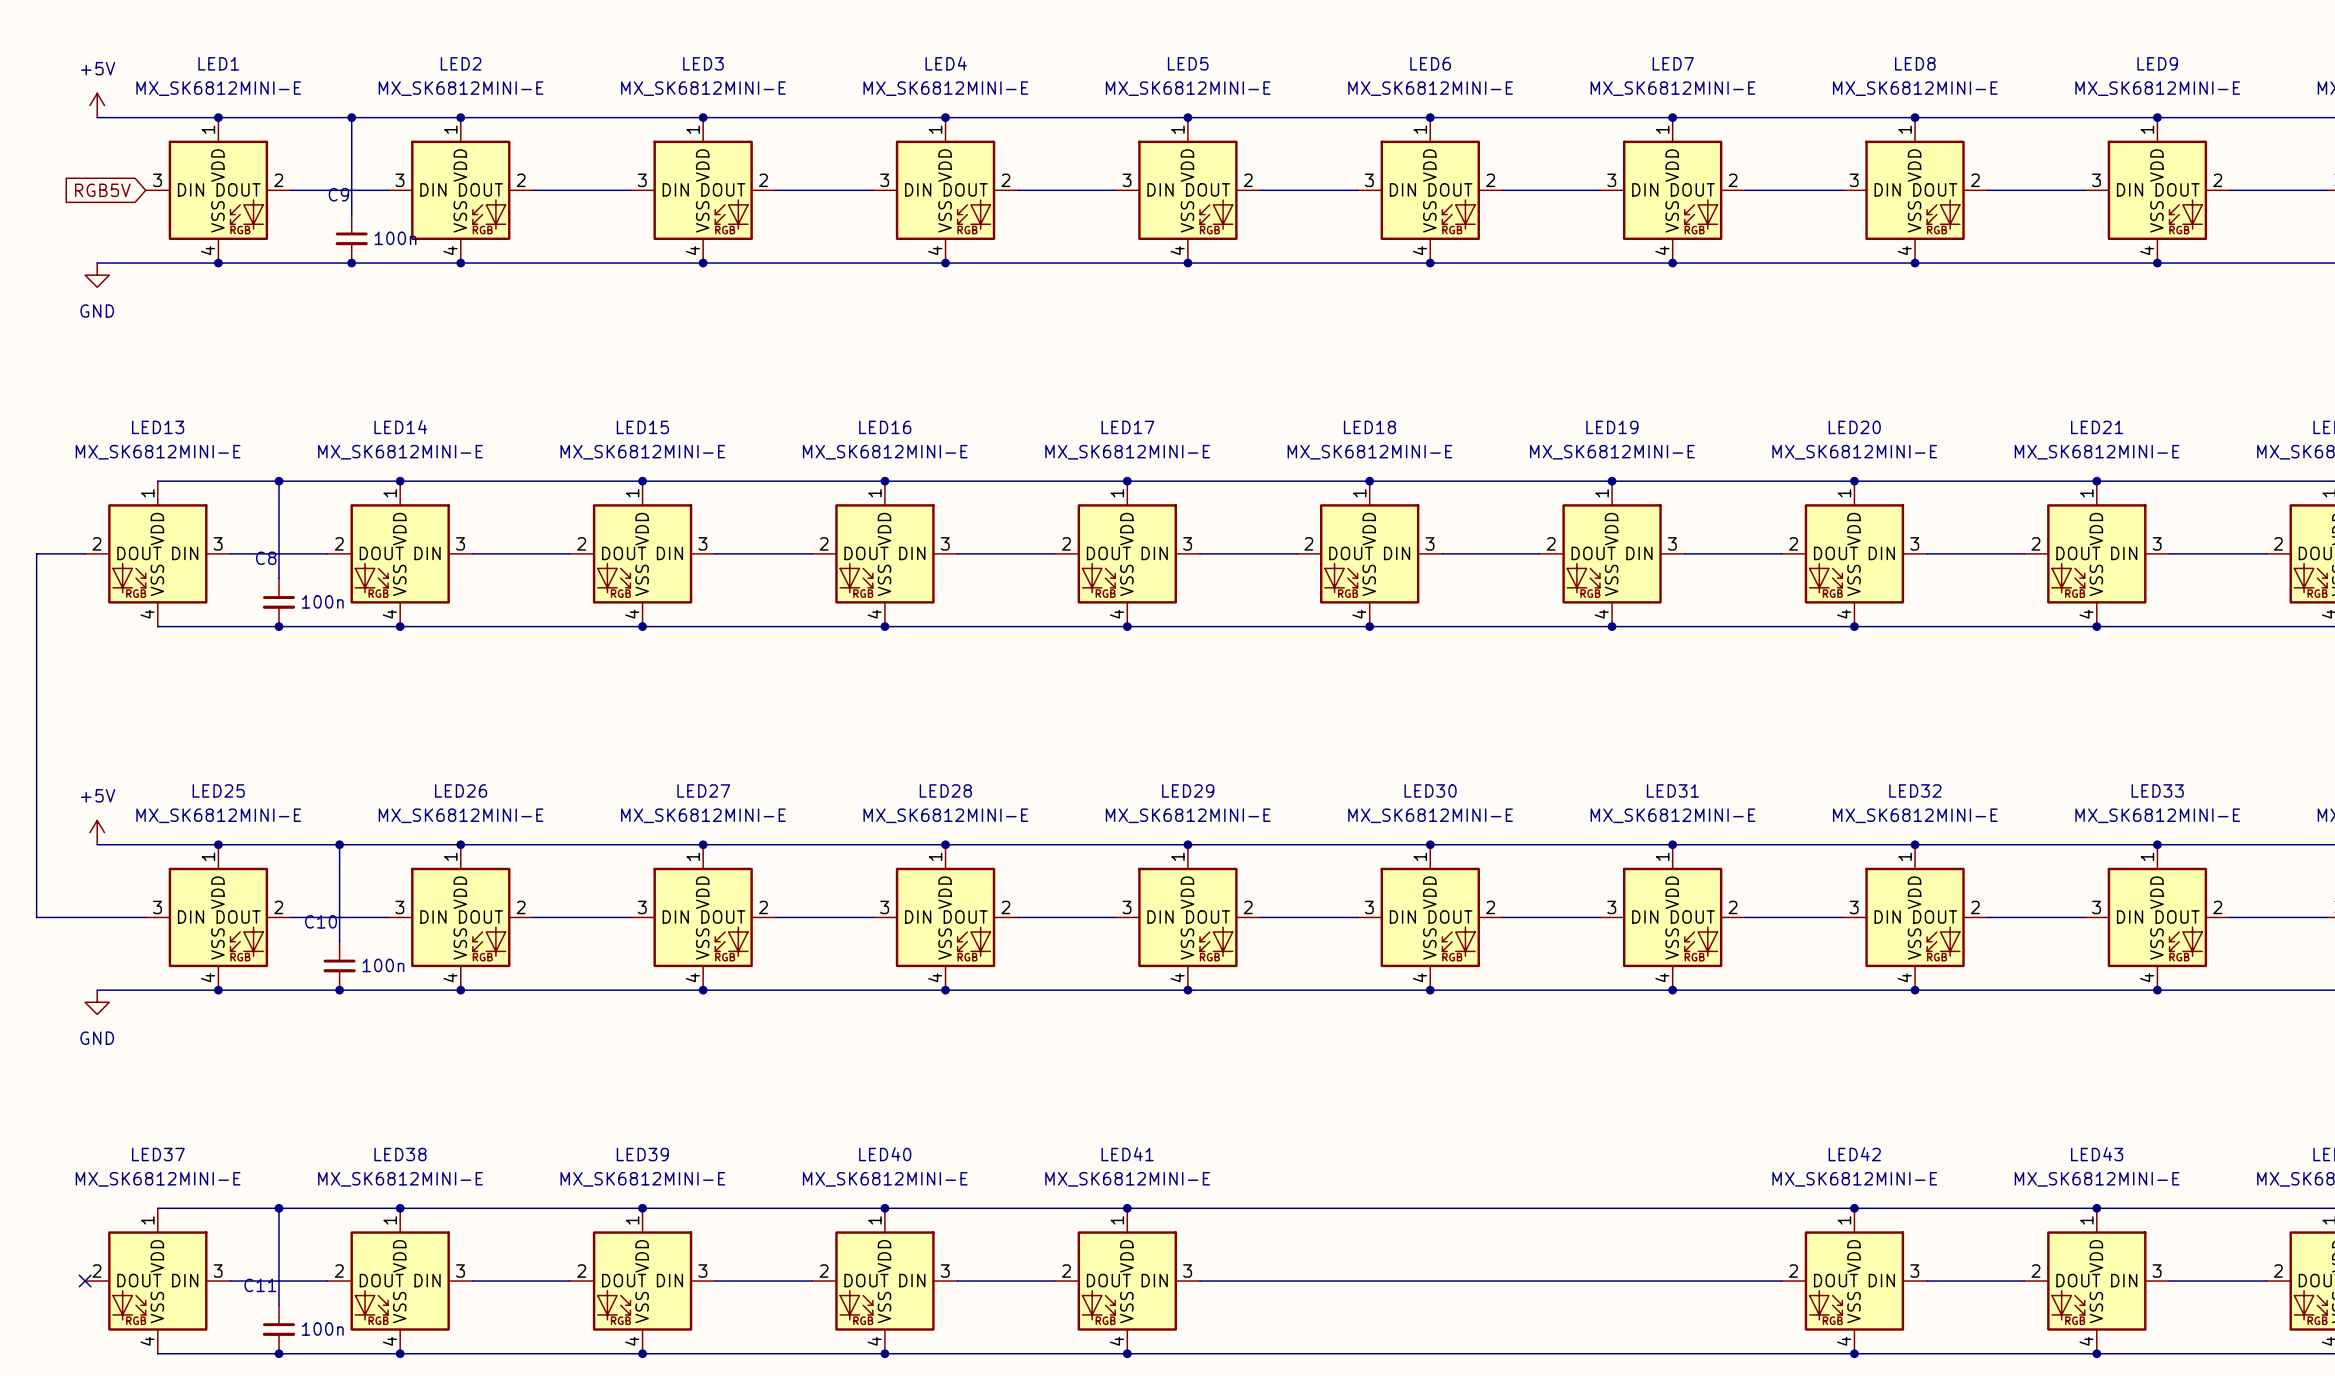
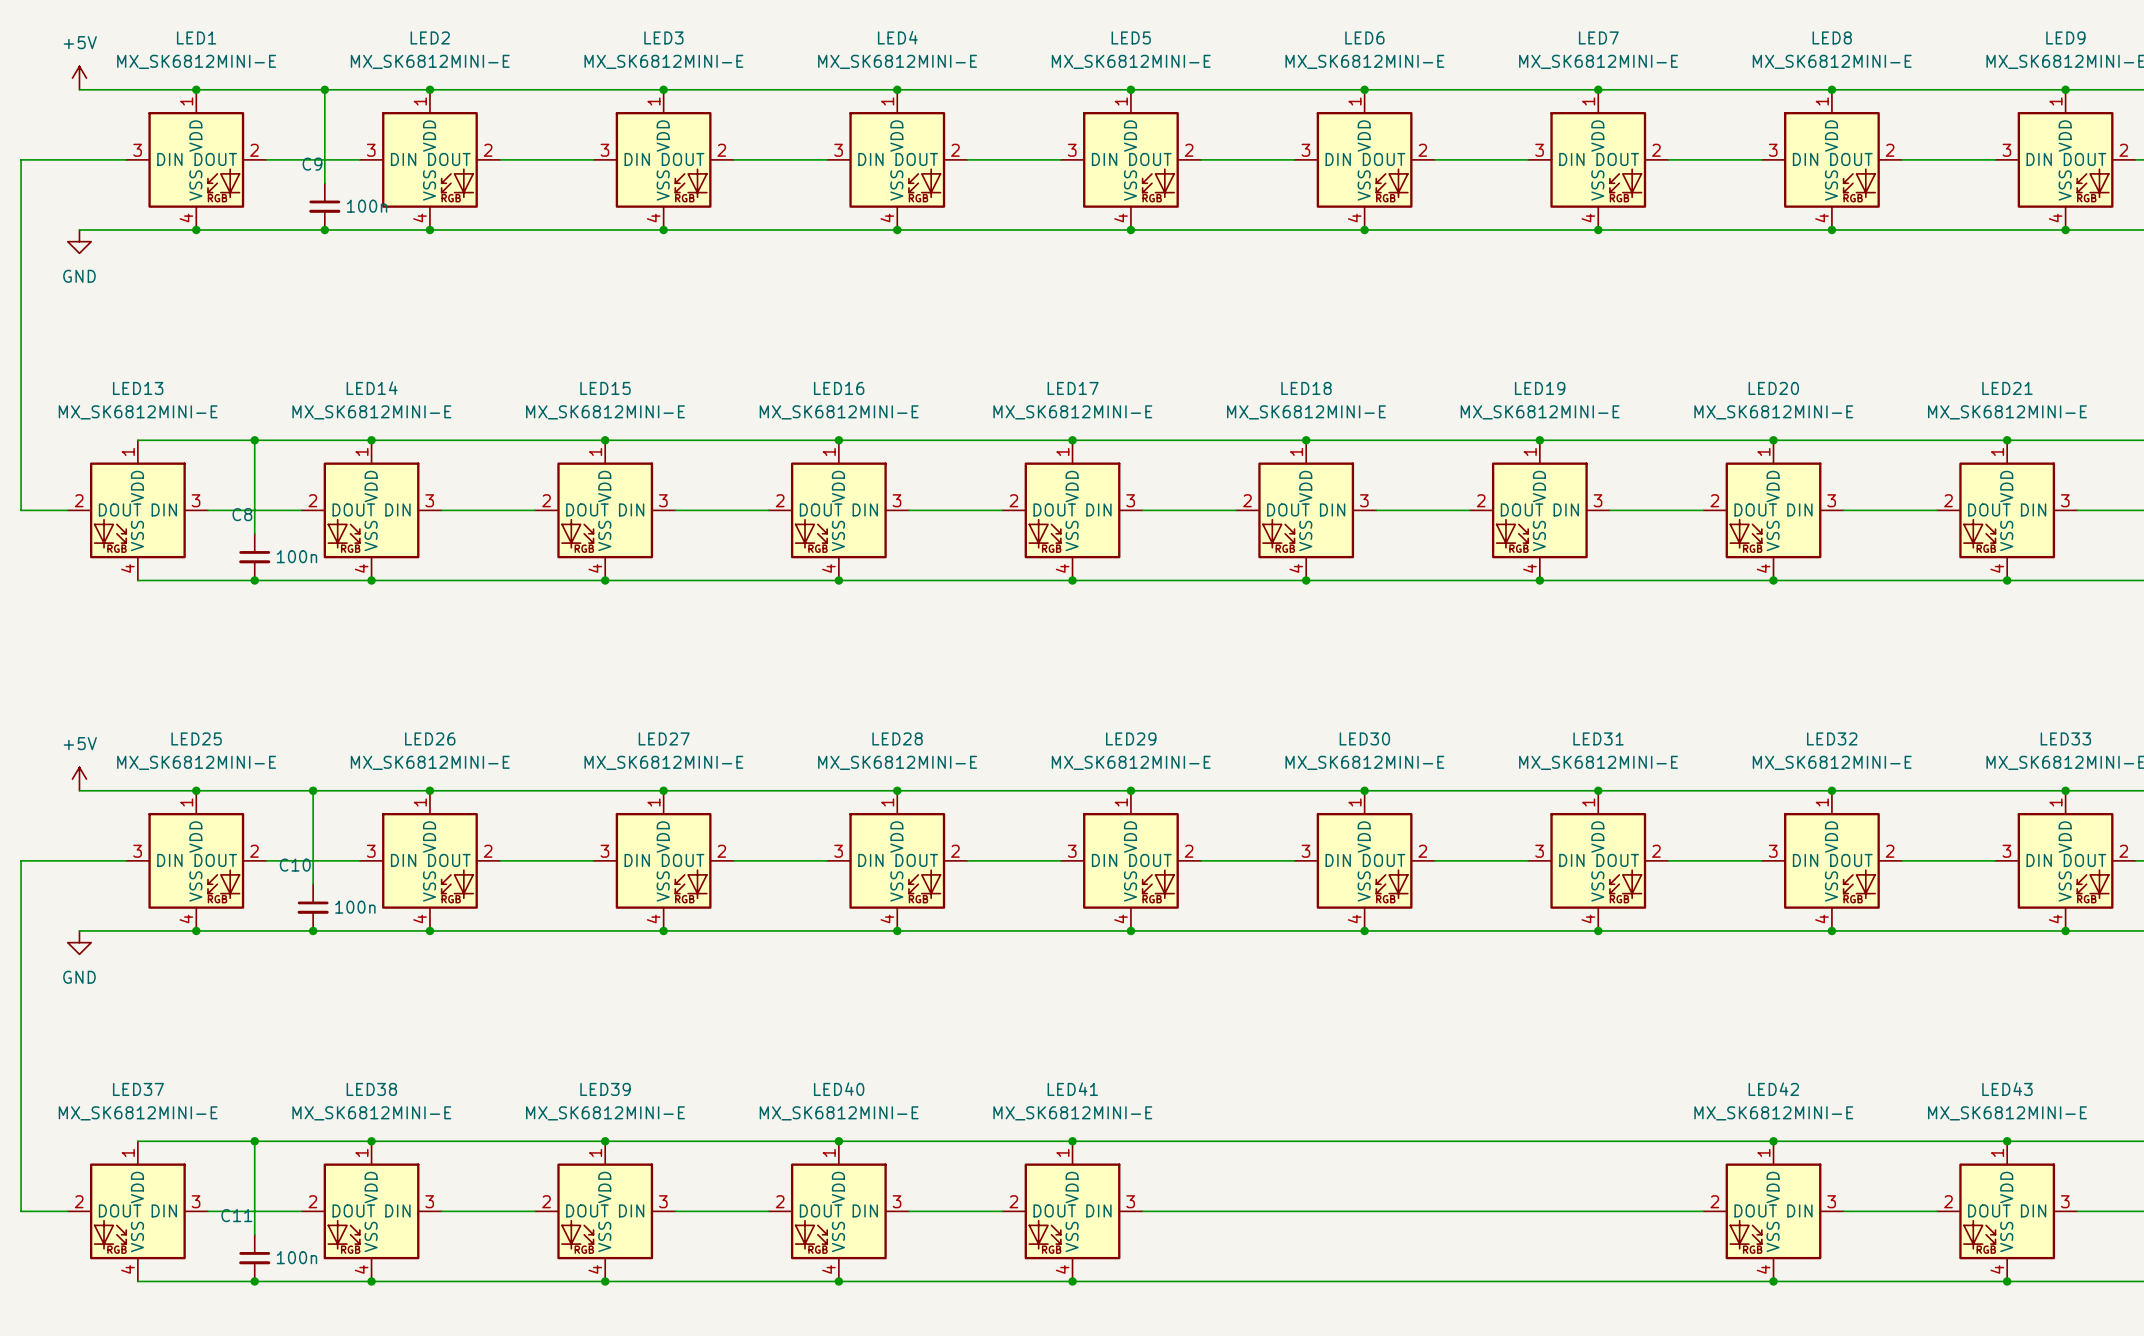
global label: RGB5V (102, 190) -> none
wire: none -> (126, 159) (21, 159) (21, 510)
wire: (36, 553) (36, 917) -> (67, 1211) (21, 1211) (21, 860)
no-connect mark: (85, 1281) -> none

